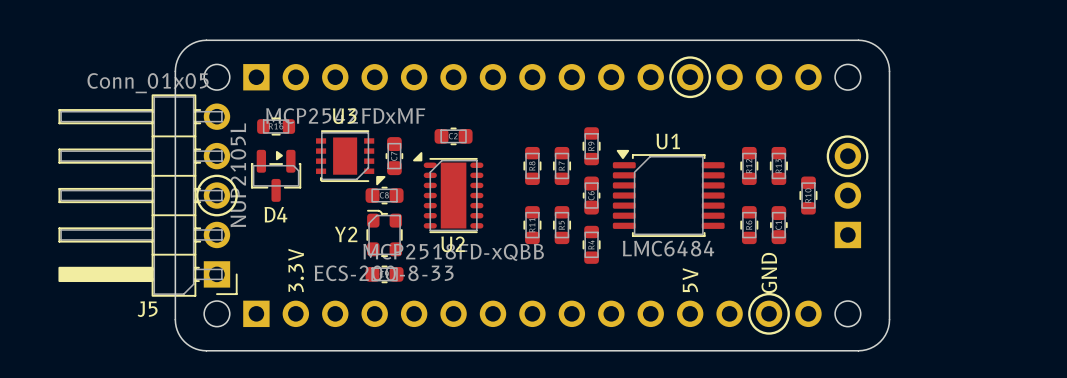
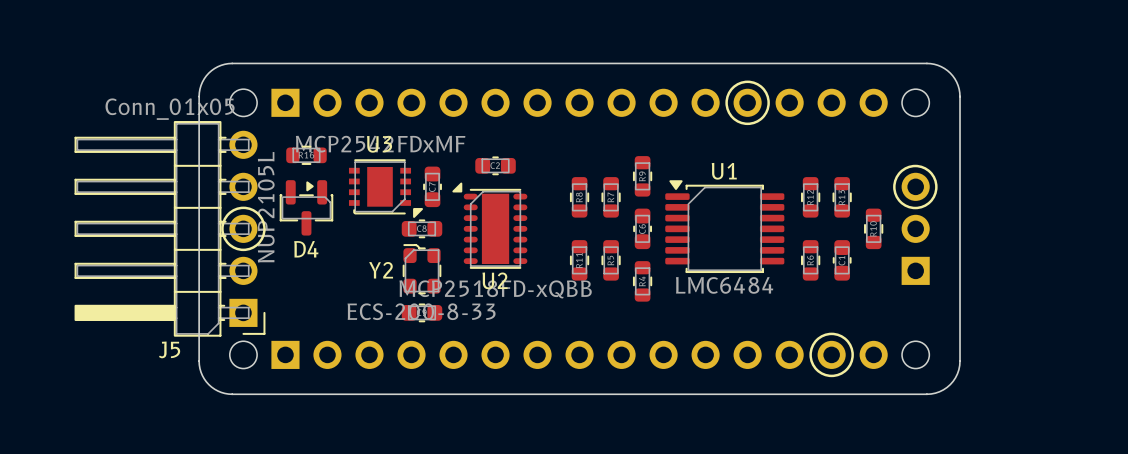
text: 3.3V (296, 270) -> none
text: GND (769, 273) -> none
text: 5V (690, 280) -> none

